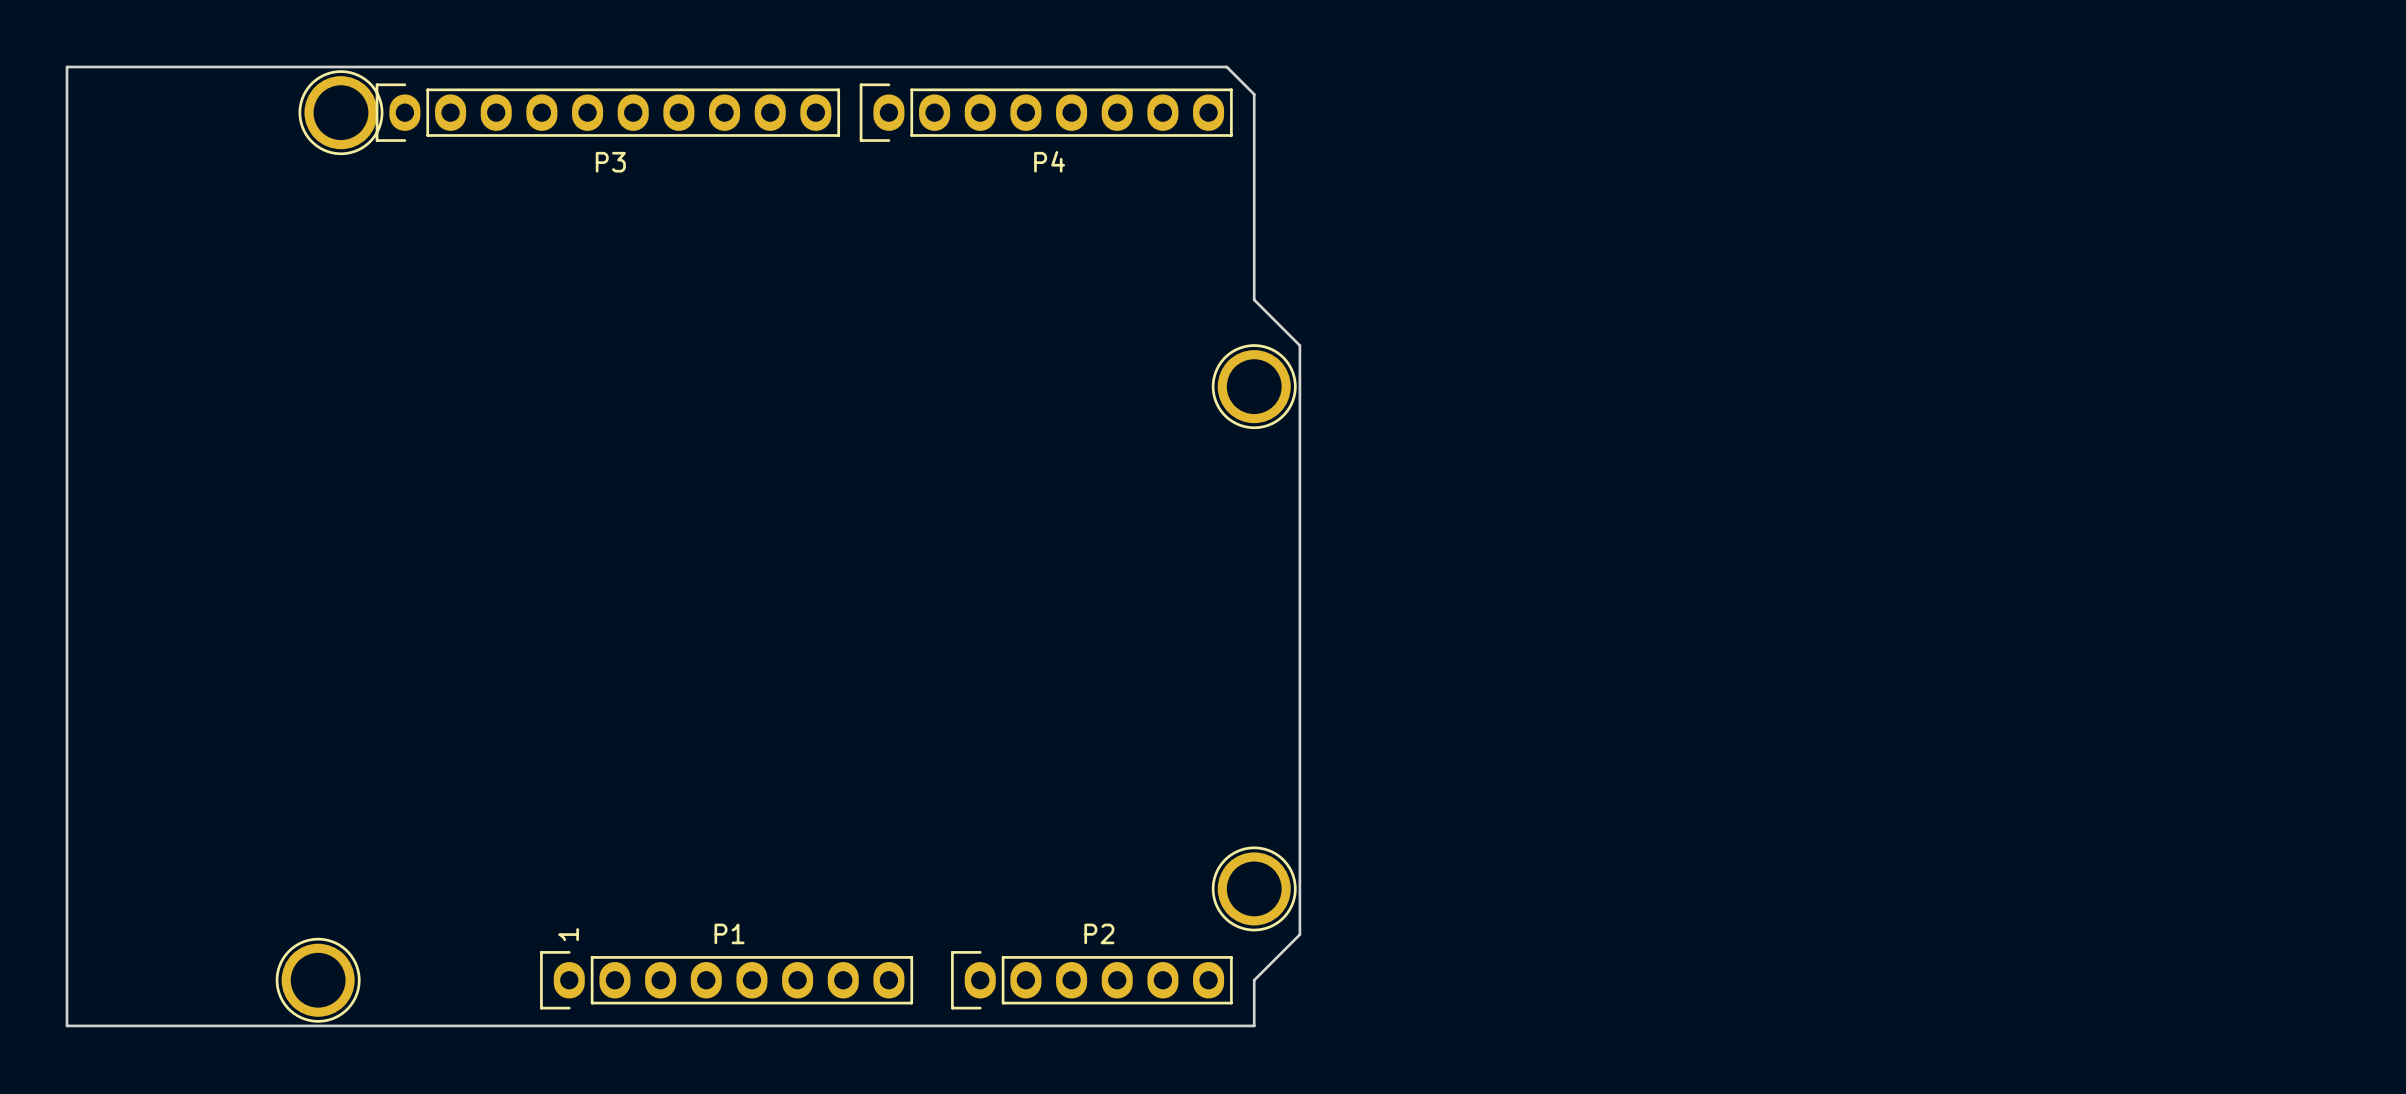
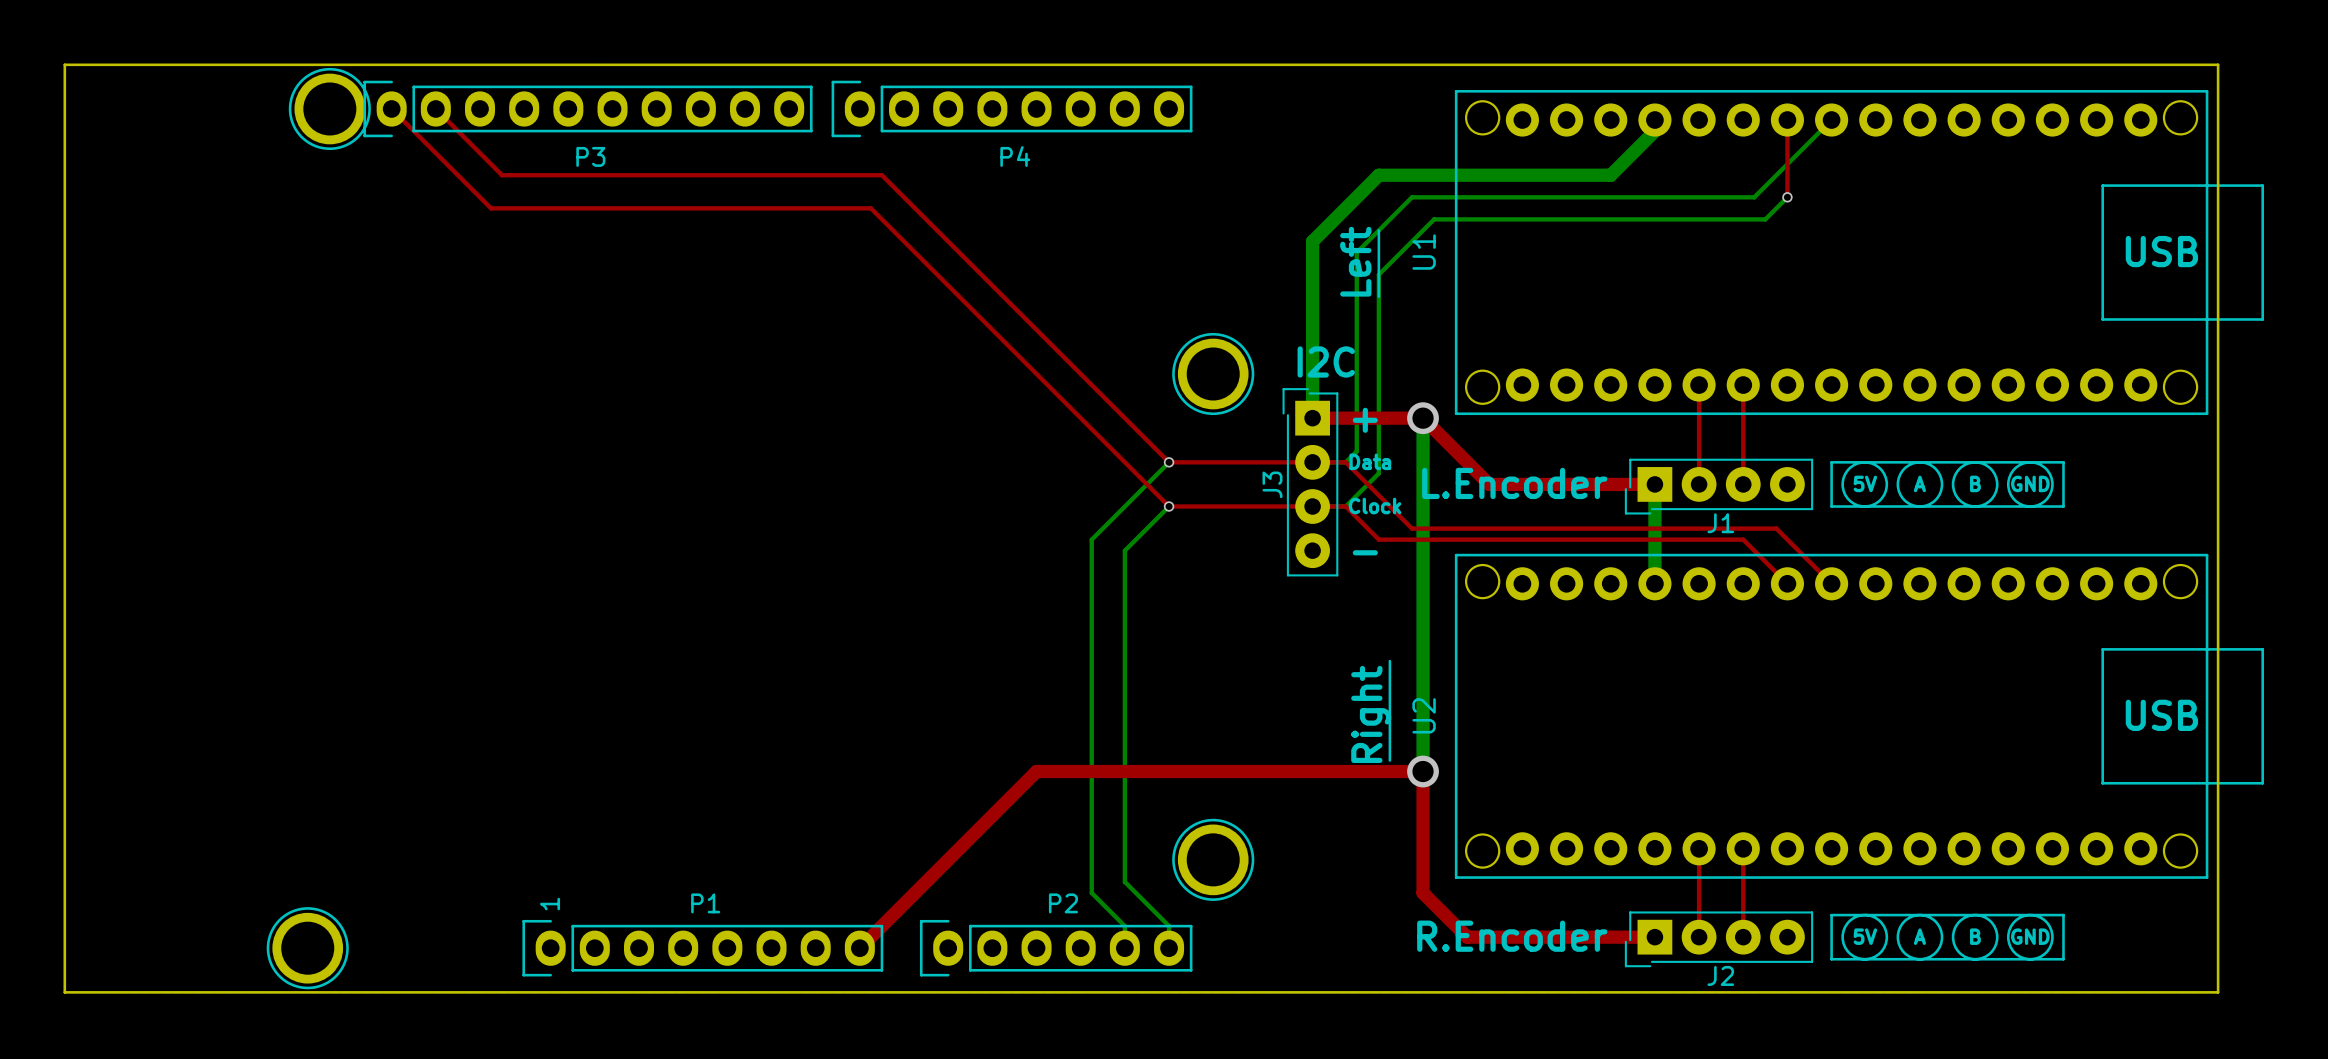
board edge: (1226, 67) (1254, 94) (1254, 299) (1299, 345) (1299, 934) (1254, 980) (1254, 1025) -> (1186, 64) (2218, 64) (2218, 992) (1213, 992)
top track: none -> (391, 108) (491, 208) (870, 208) (1169, 506) (1345, 506) (1378, 539) (1743, 539) (1787, 583)
top track: none -> (435, 108) (502, 175) (881, 175) (1169, 462) (1345, 462) (1411, 528) (1776, 528) (1831, 583)
bottom track: none -> (1654, 120) (1654, 131) (1610, 175) (1378, 175) (1312, 241) (1312, 418)
top track: none -> (1787, 120) (1787, 197)
bottom track: none -> (1831, 120) (1754, 197) (1411, 197) (1356, 252) (1356, 451) (1345, 462) (1312, 462)
bottom track: none -> (1787, 197) (1765, 219) (1434, 219) (1378, 274) (1378, 473) (1345, 506) (1312, 506)
via: none -> (1787, 197)
line: none -> (1378, 230) (1378, 296)
text: none -> USB (2161, 251)
U1: none -> (1859, 252)
text: none -> Left (1355, 261)
text: none -> I2C (1326, 361)
top track: none -> (1699, 385) (1699, 484)
top track: none -> (1743, 385) (1743, 484)
top track: none -> (1312, 418) (1423, 418) (1489, 484) (1654, 484)
bottom track: none -> (1423, 418) (1423, 771)
via: none -> (1423, 418)
text: none -> + (1365, 420)
drawing: none -> [1841, 461, 2054, 508]
bottom track: none -> (1169, 462) (1091, 539) (1091, 892) (1124, 926) (1124, 948)
via: none -> (1169, 462)
text: none -> Data (1370, 461)
line: none -> (1831, 462) (2063, 462) (2063, 506) (1831, 506) (1831, 462)
J3: none -> (1310, 482)
text: none -> L.Encoder (1514, 483)
bottom track: none -> (1654, 484) (1654, 583)
text: none -> 5V (1865, 483)
text: none -> A (1919, 483)
text: none -> B (1975, 483)
text: none -> GND (2030, 483)
J1: none -> (1719, 486)
bottom track: none -> (1169, 506) (1124, 550) (1124, 881) (1169, 926) (1169, 948)
via: none -> (1169, 506)
text: none -> Clock (1375, 506)
text: none -> - (1365, 552)
line: none -> (1389, 661) (1389, 760)
text: none -> Right (1371, 714)
text: none -> USB (2161, 715)
U2: none -> (1859, 716)
via: none -> (1423, 771)
top track: none -> (1699, 848) (1699, 937)
top track: none -> (1743, 848) (1743, 937)
drawing: none -> [1841, 913, 2054, 961]
line: none -> (1831, 915) (1831, 959) (2063, 959) (2063, 915) (1831, 915)
text: none -> R.Encoder (1512, 936)
top track: none -> (1654, 937) (1467, 937) (1423, 892) (1423, 771) (1036, 771) (859, 948)
text: none -> 5V (1865, 936)
text: none -> A (1919, 936)
text: none -> B (1975, 936)
text: none -> GND (2030, 936)
J2: none -> (1719, 939)

